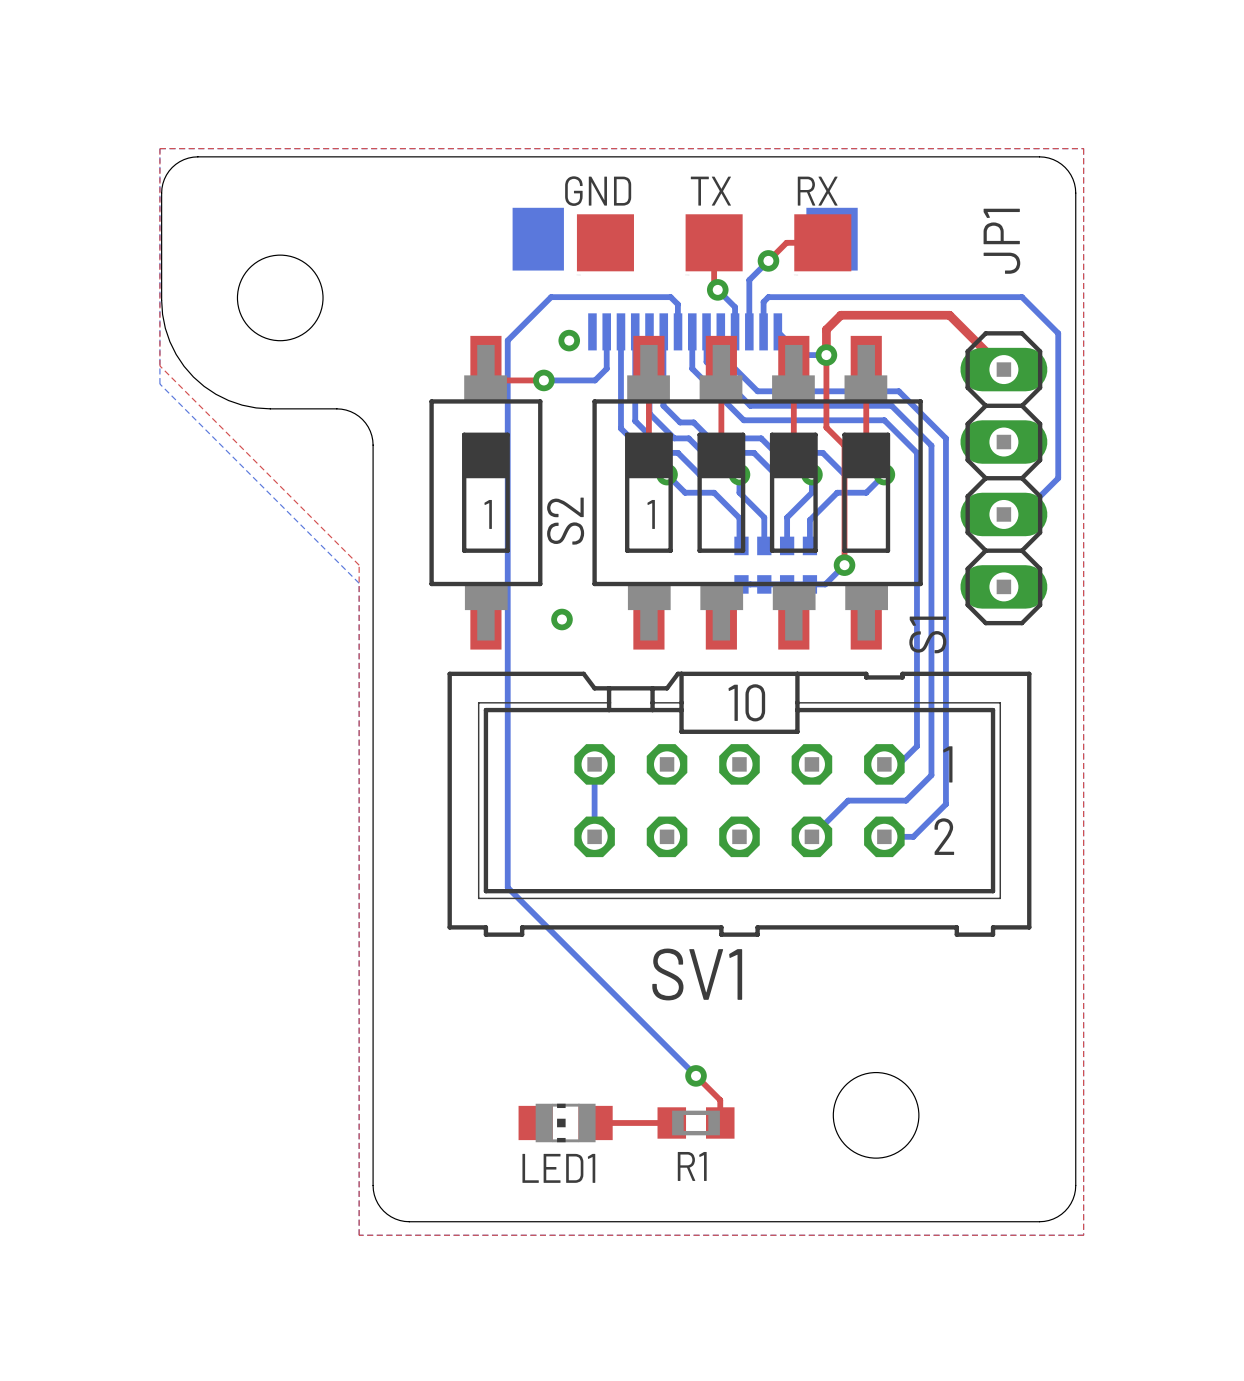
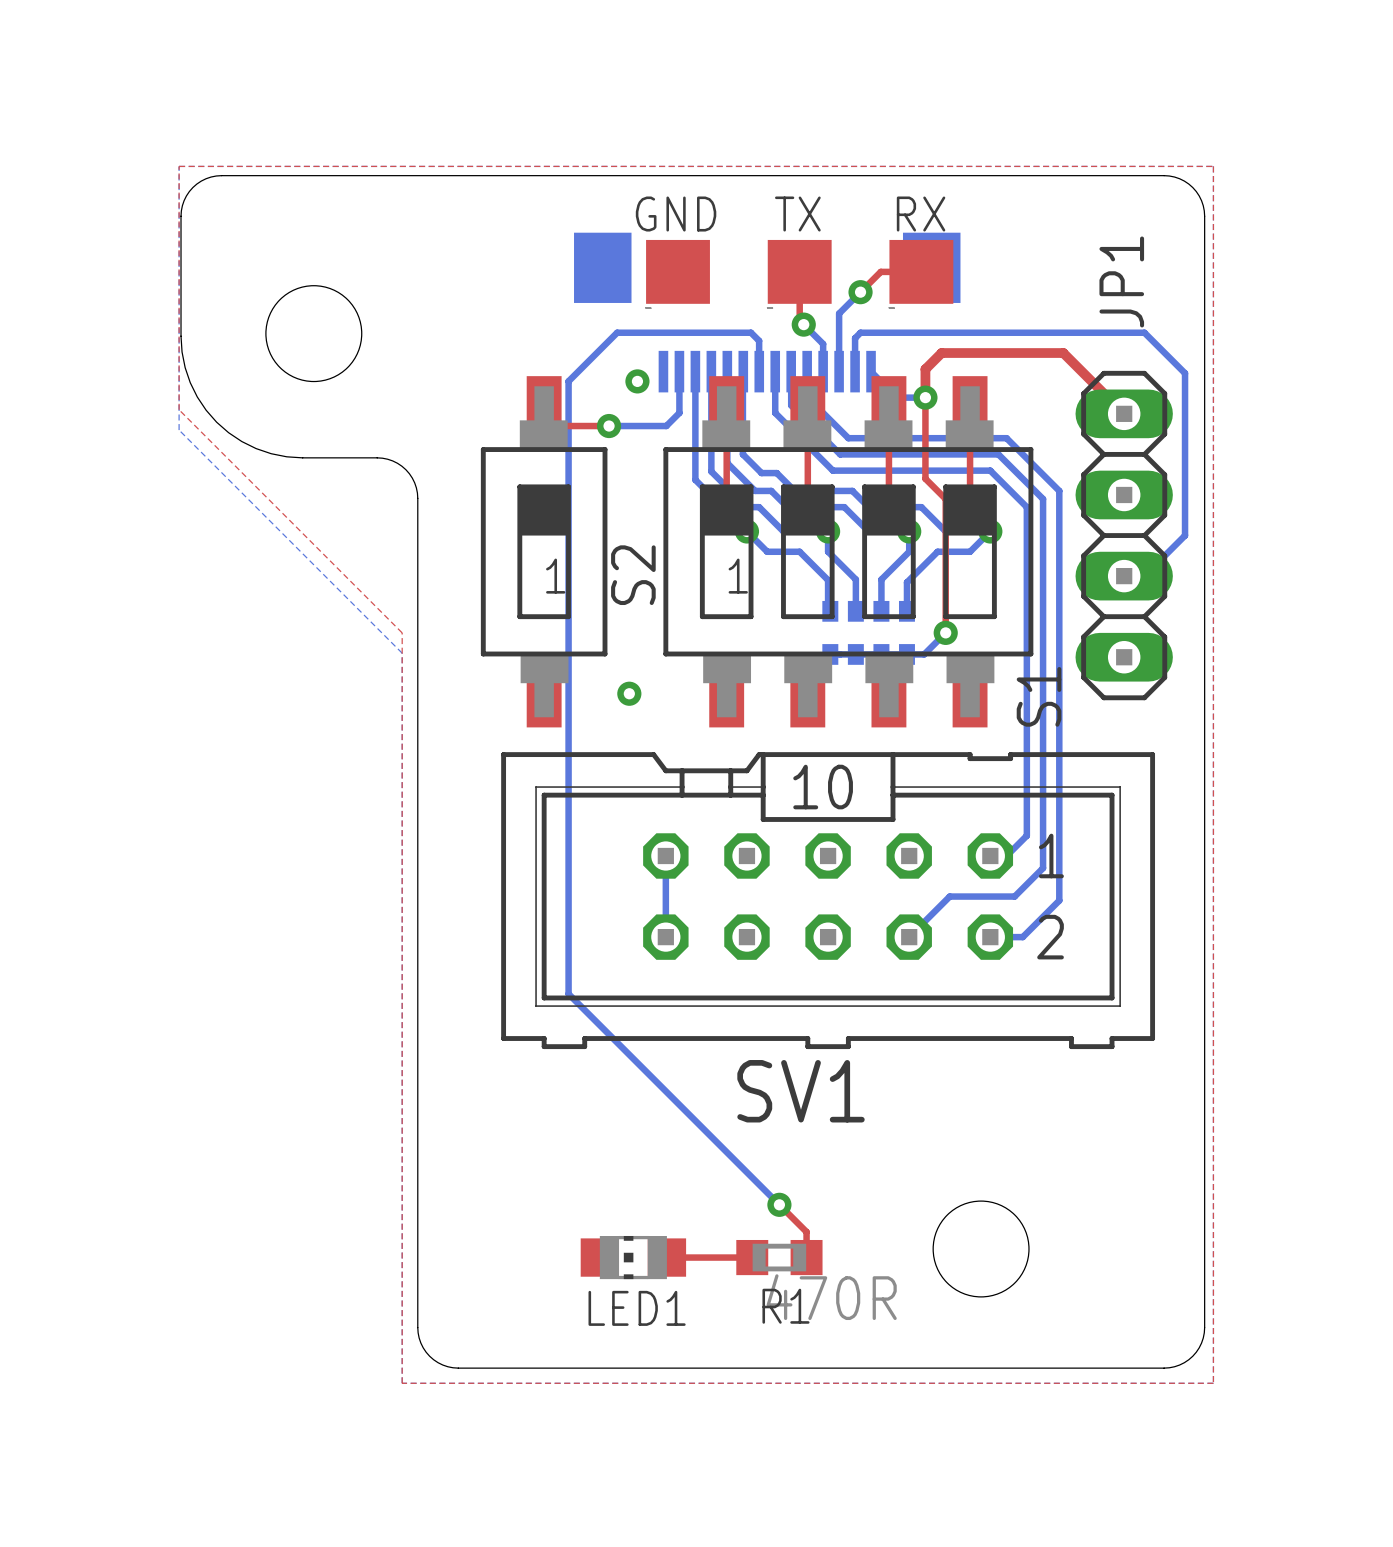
R1 value: none -> 470R (831, 1297)

